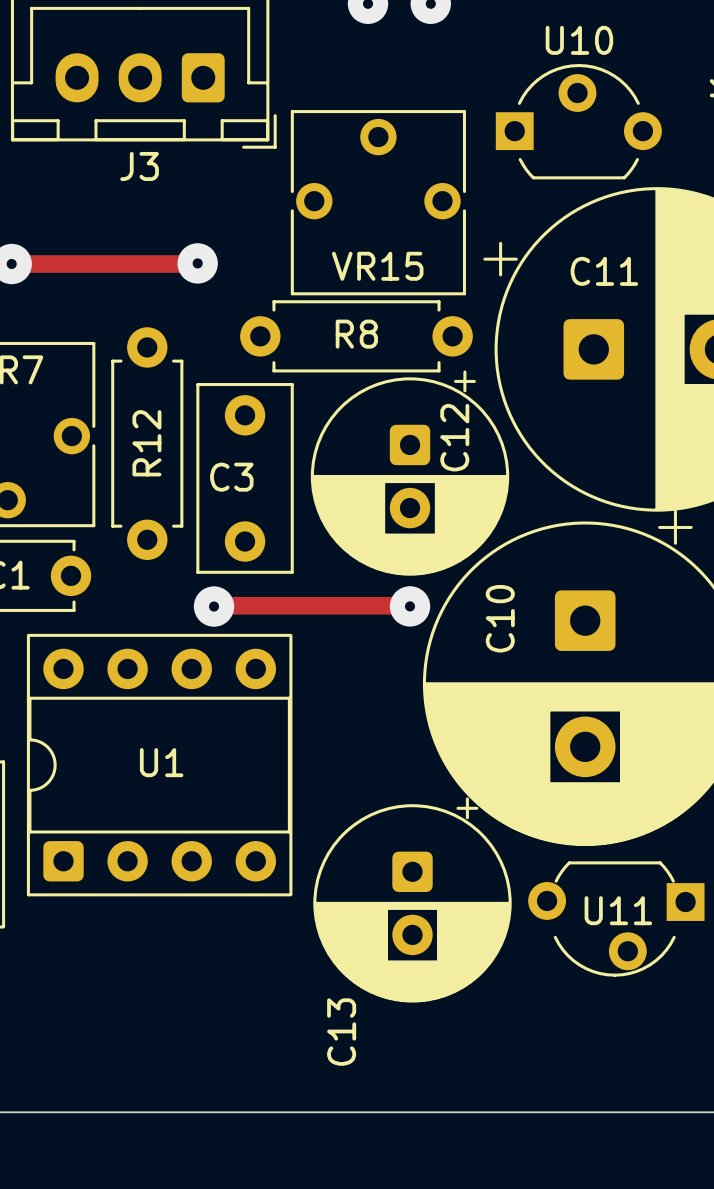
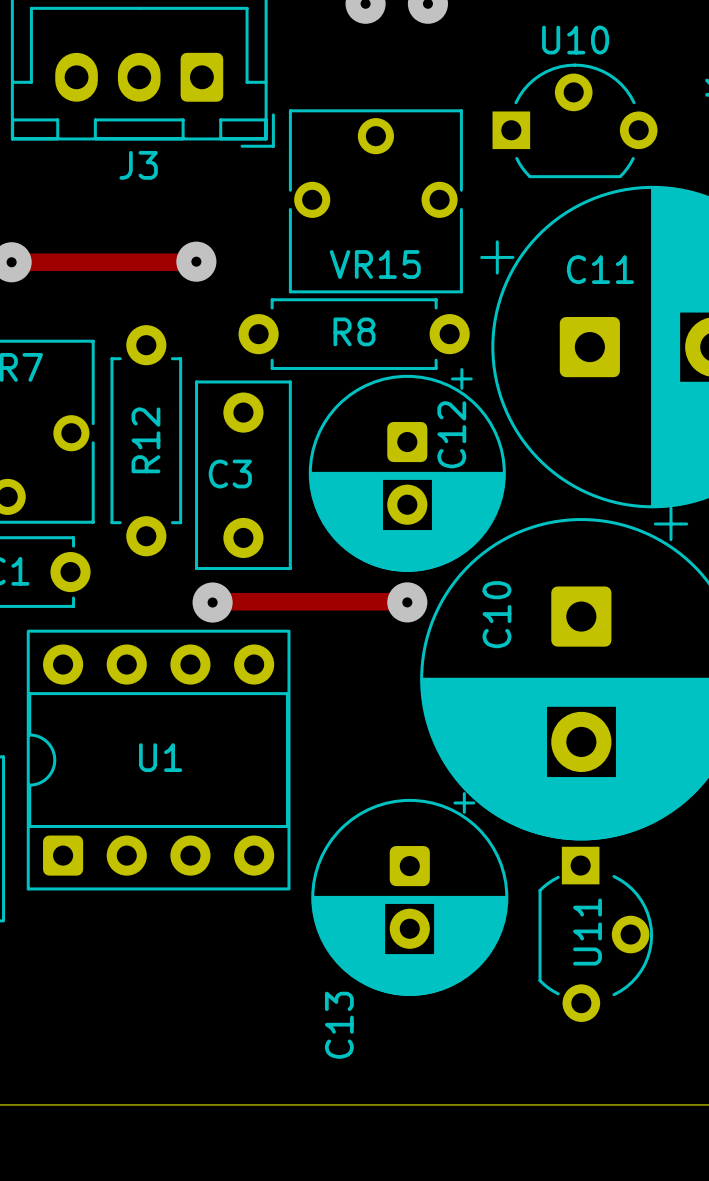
U11 footprint: [528, 861, 705, 977] -> [538, 846, 654, 1022]

